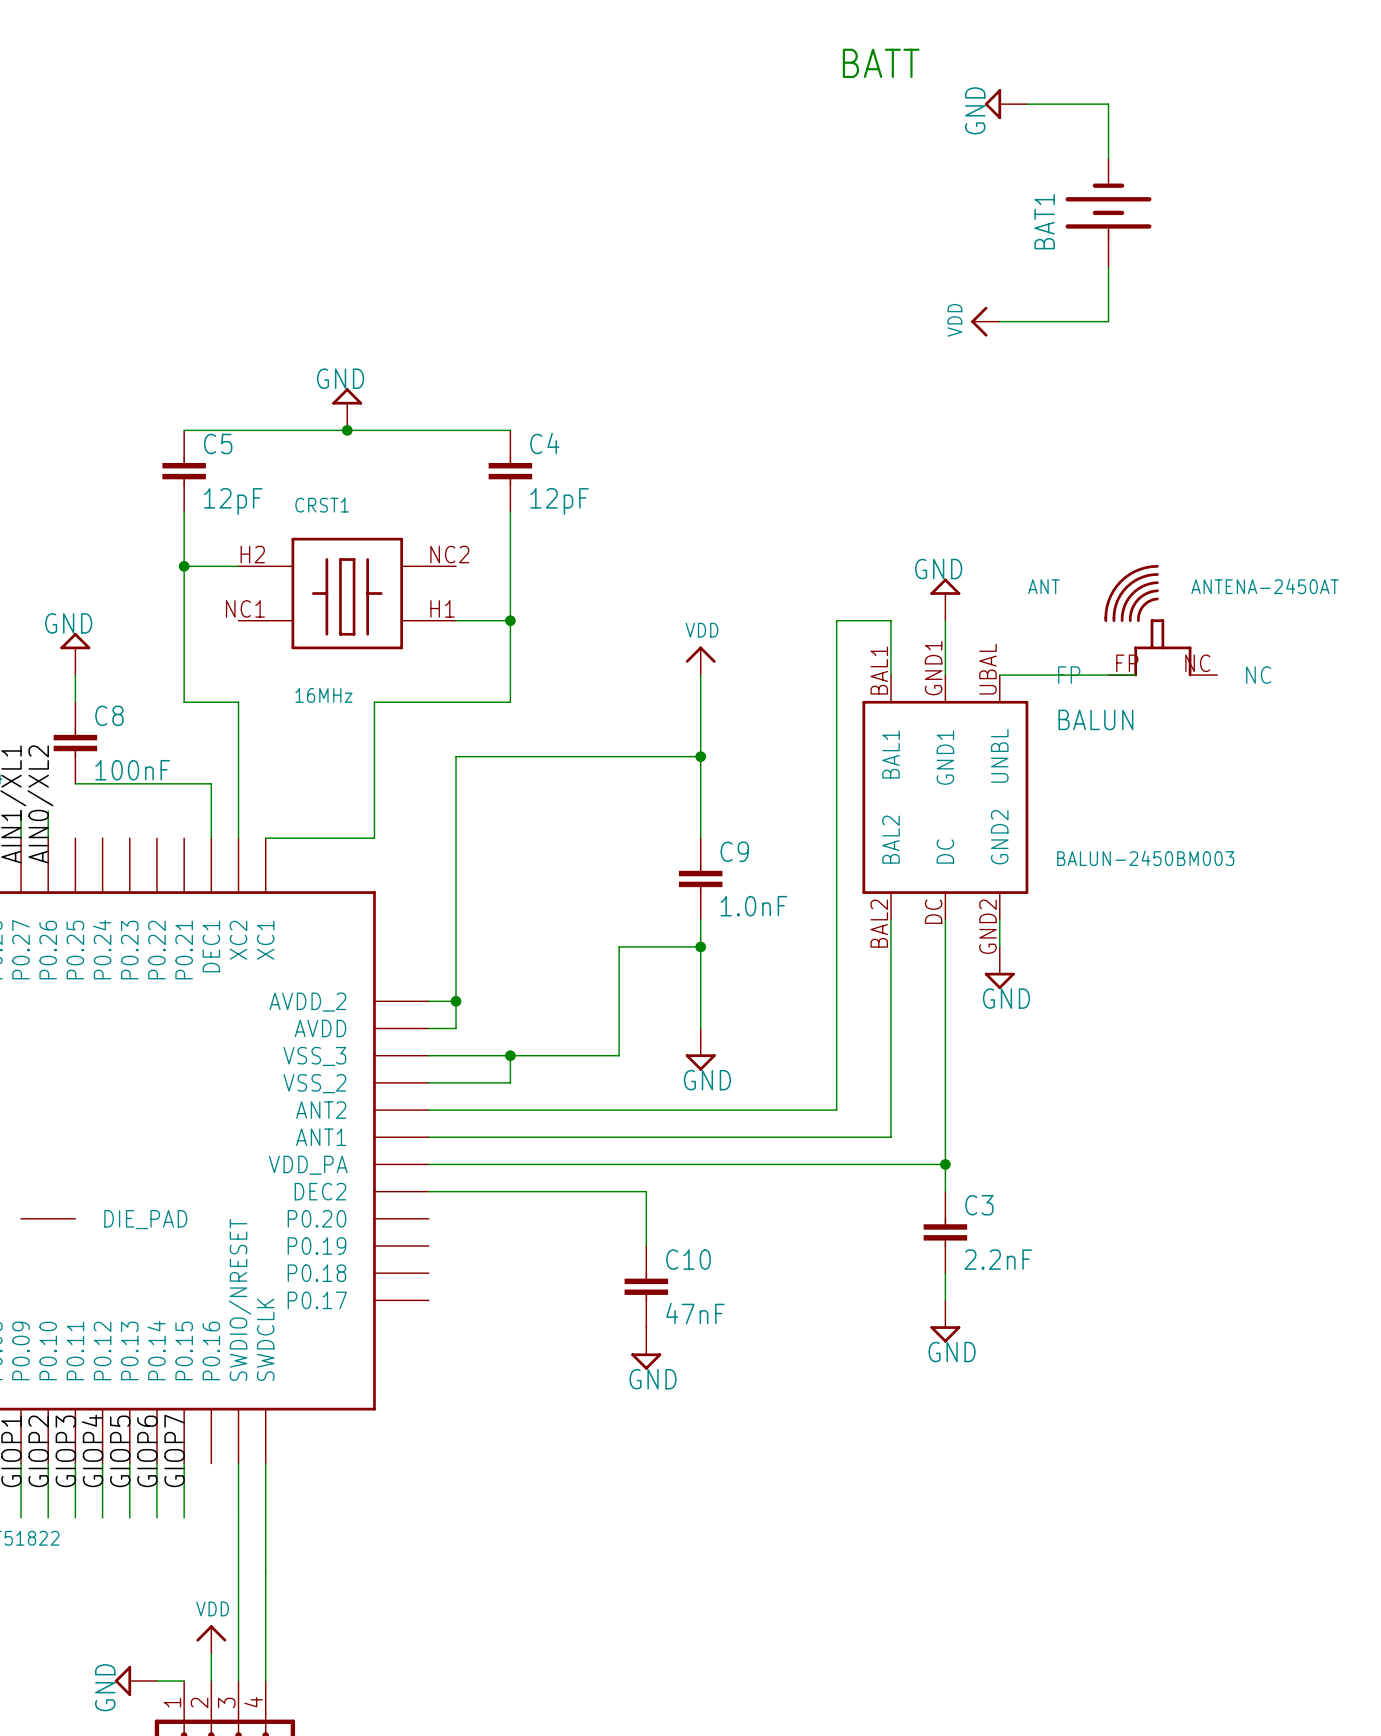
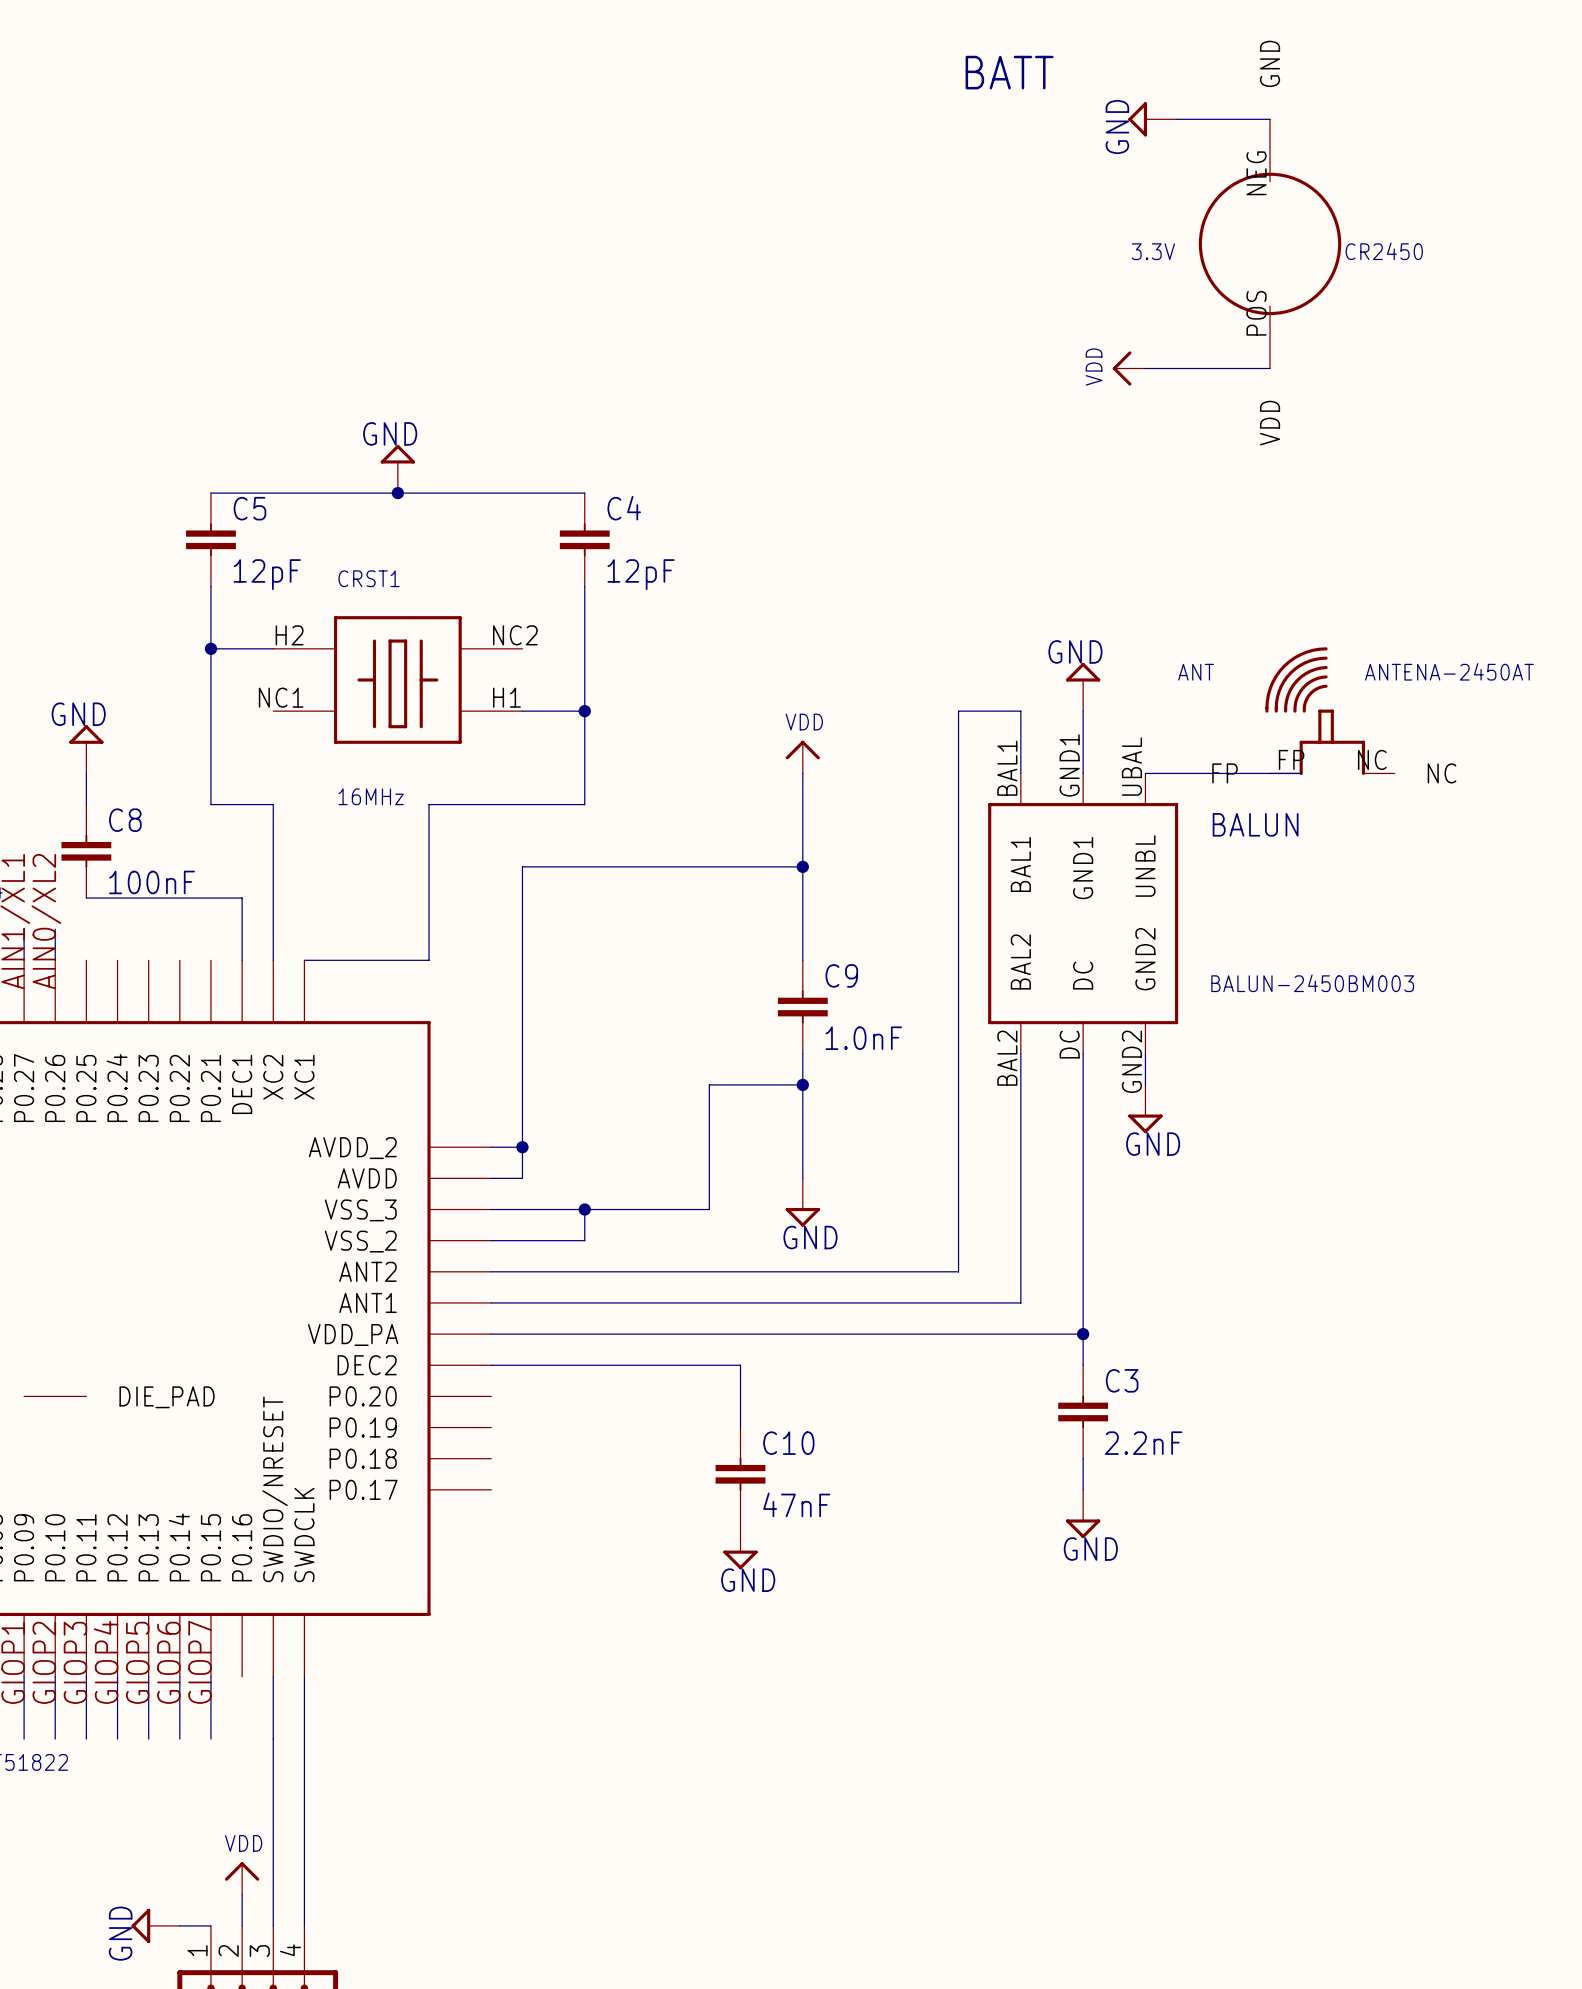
BAT1: (1108, 212) -> none
CR2450: none -> 3.3V (1270, 243)

